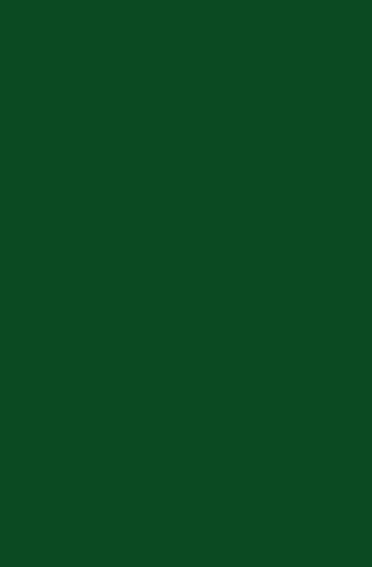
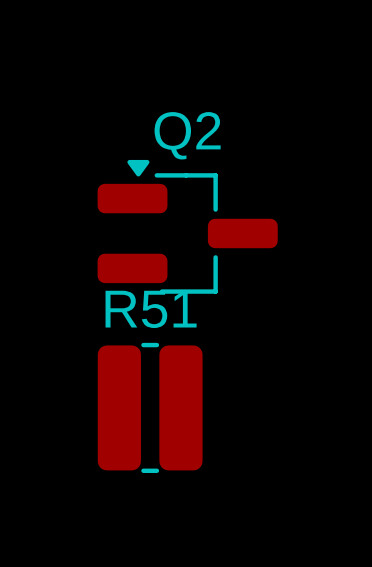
Q2: none -> (187, 226)
R51: none -> (150, 407)

